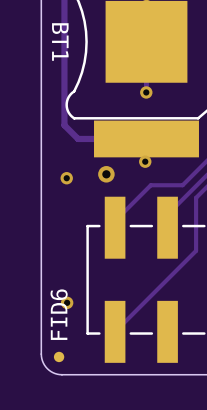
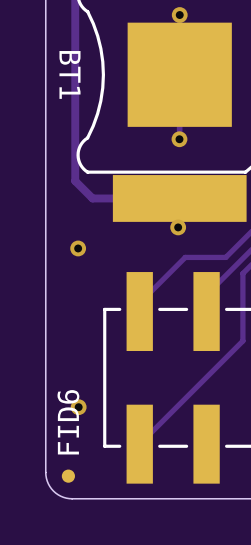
via: (106, 174) -> none

